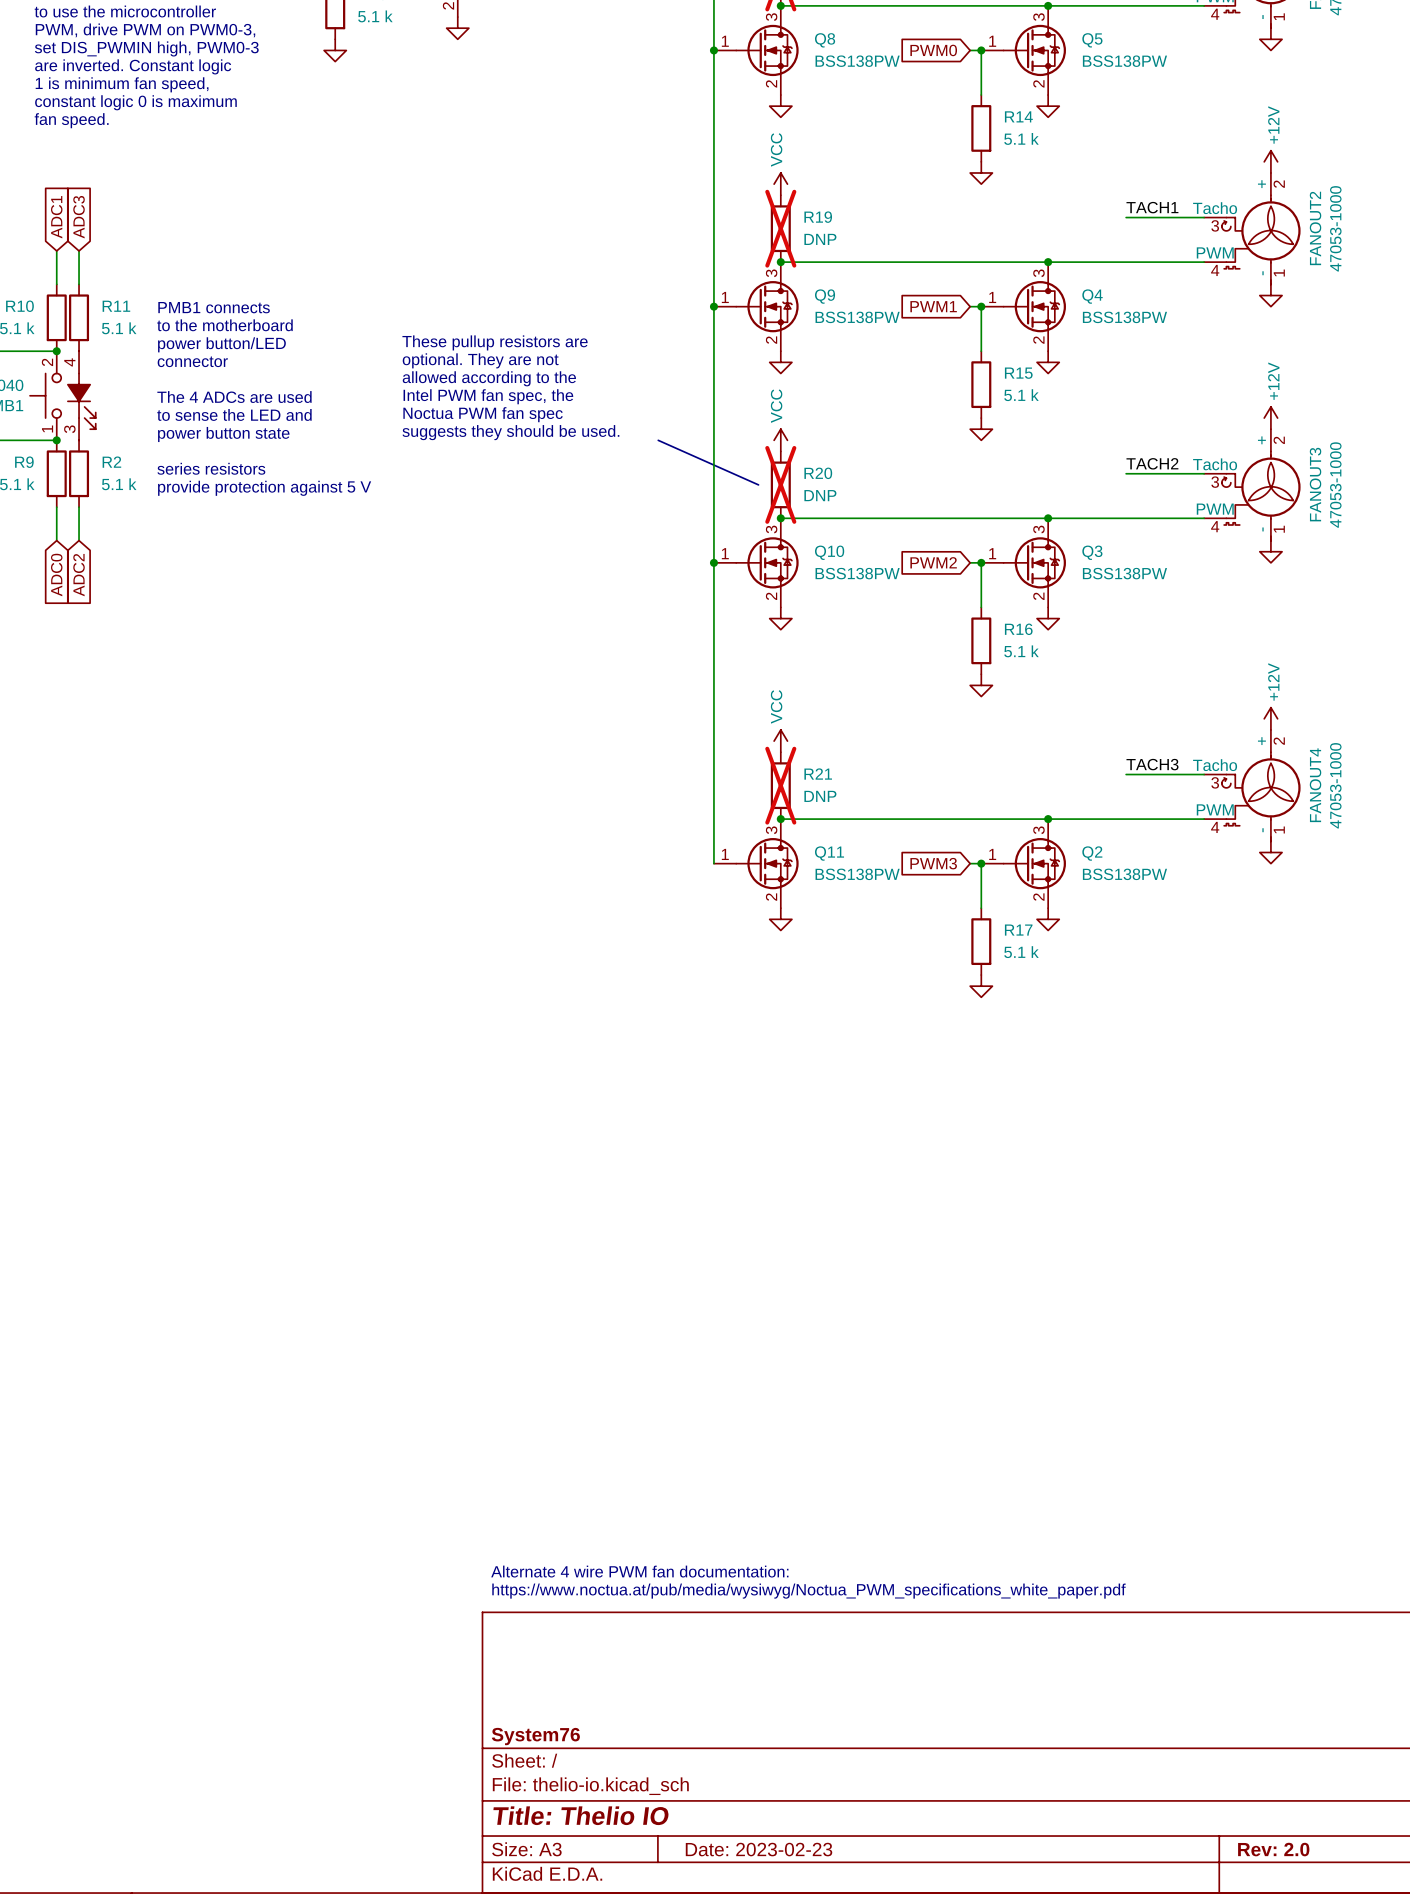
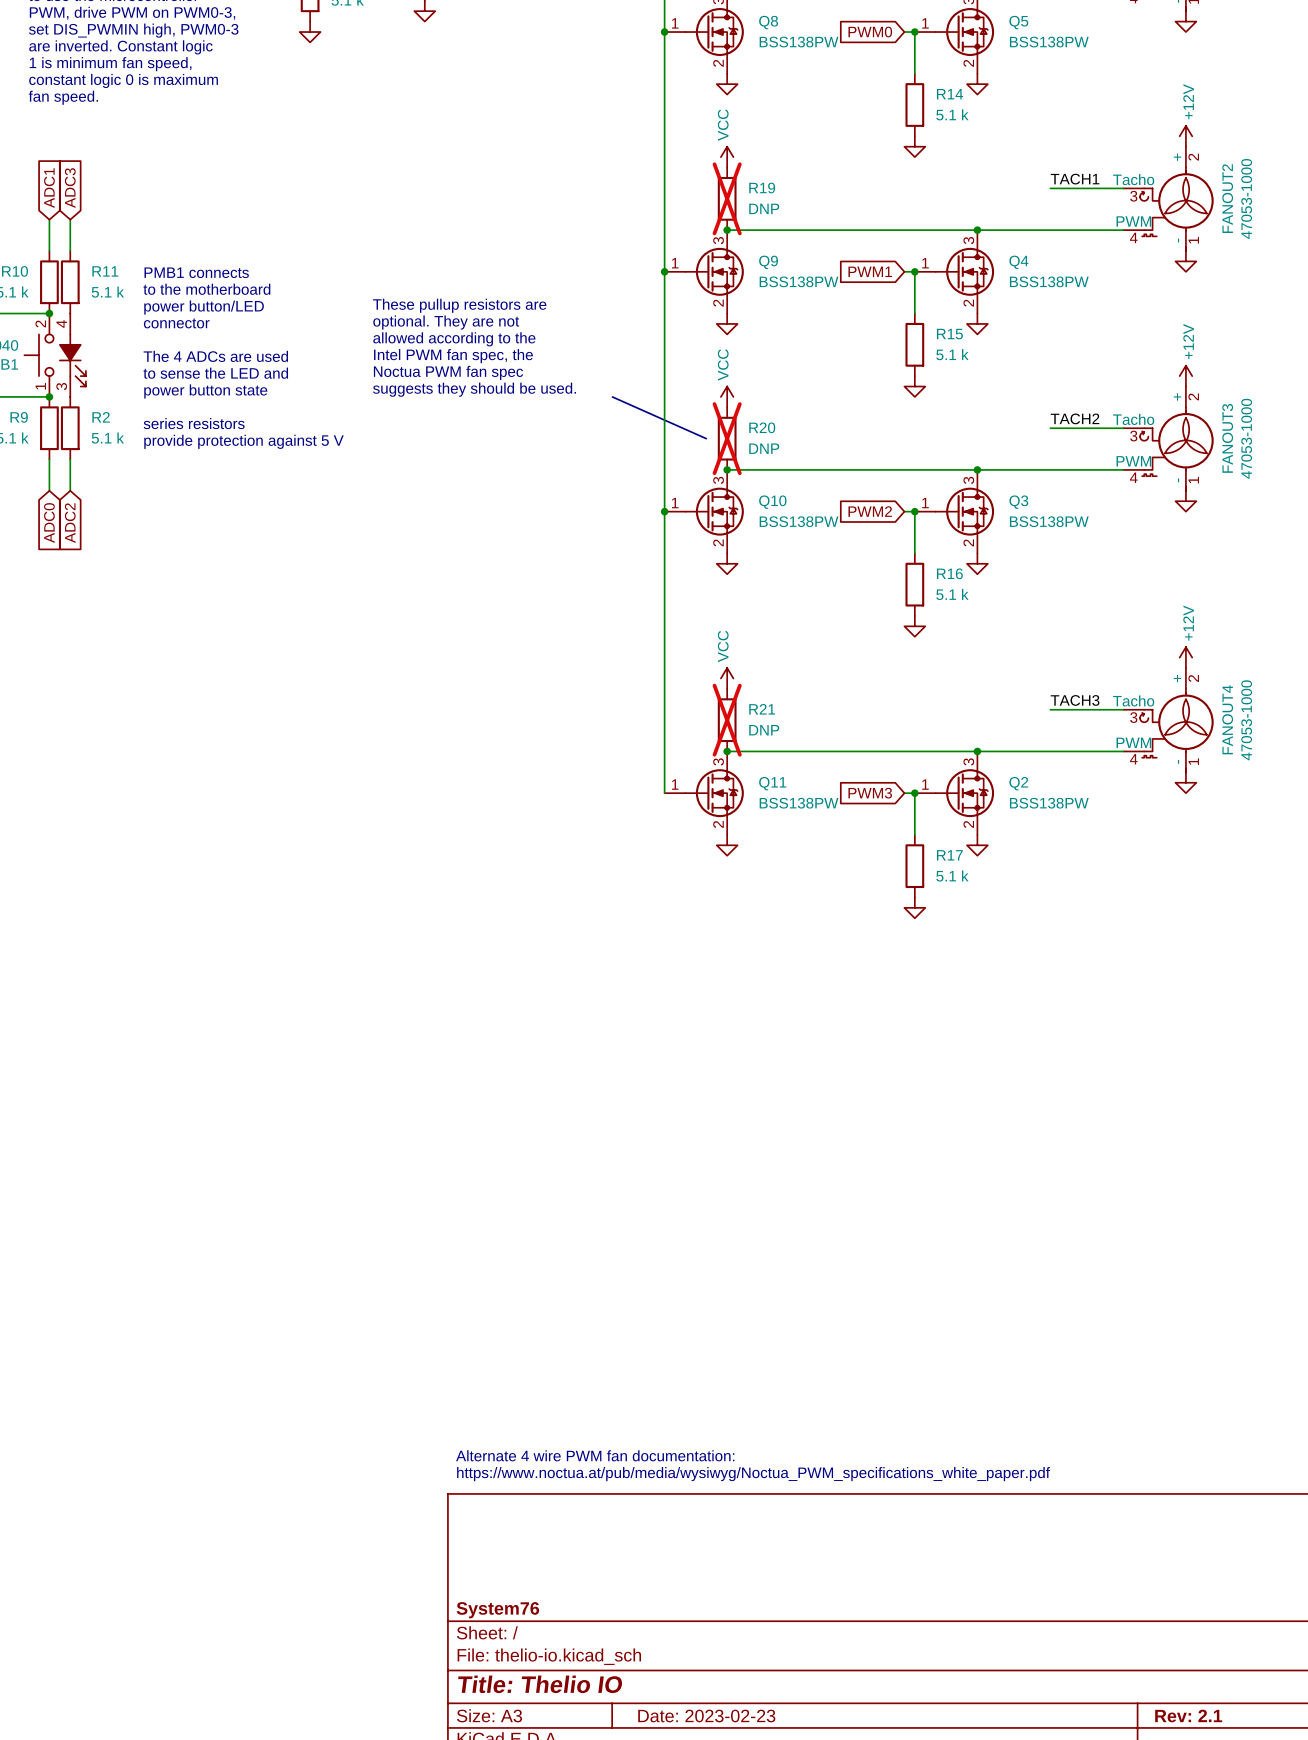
title block: Rev: 2.0 (1273, 1849) -> Rev: 2.1 (1188, 1716)

